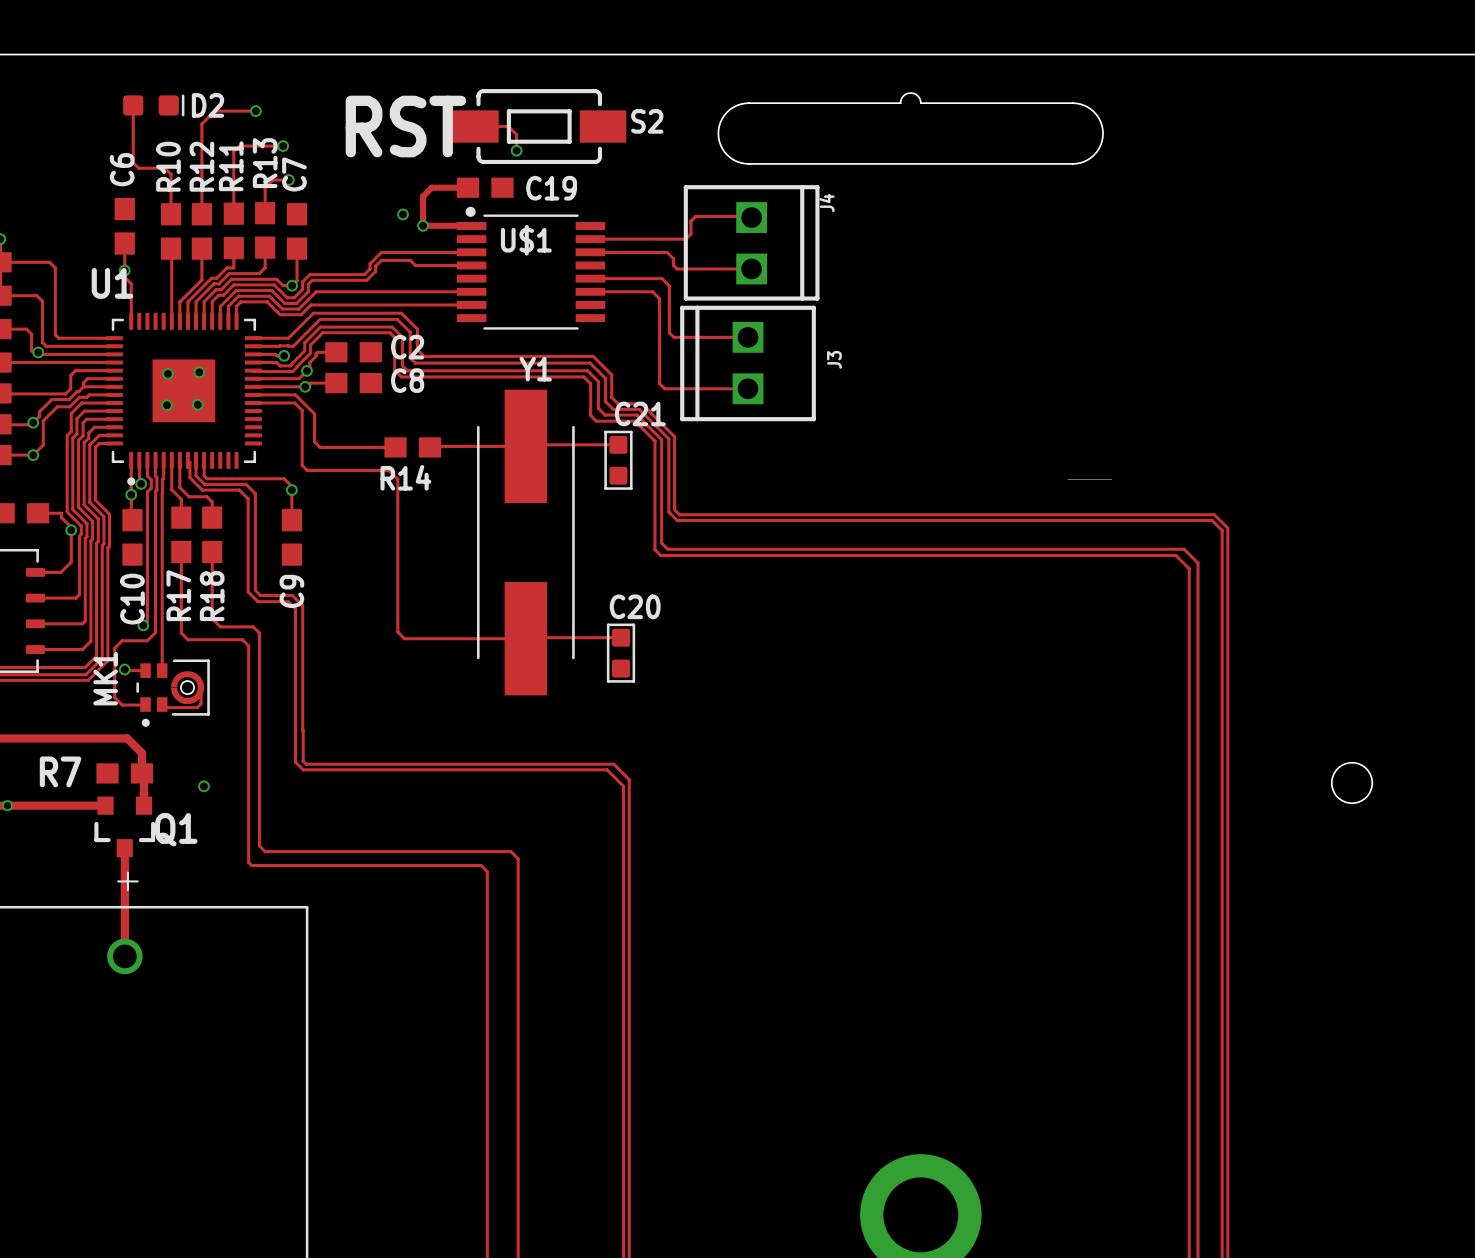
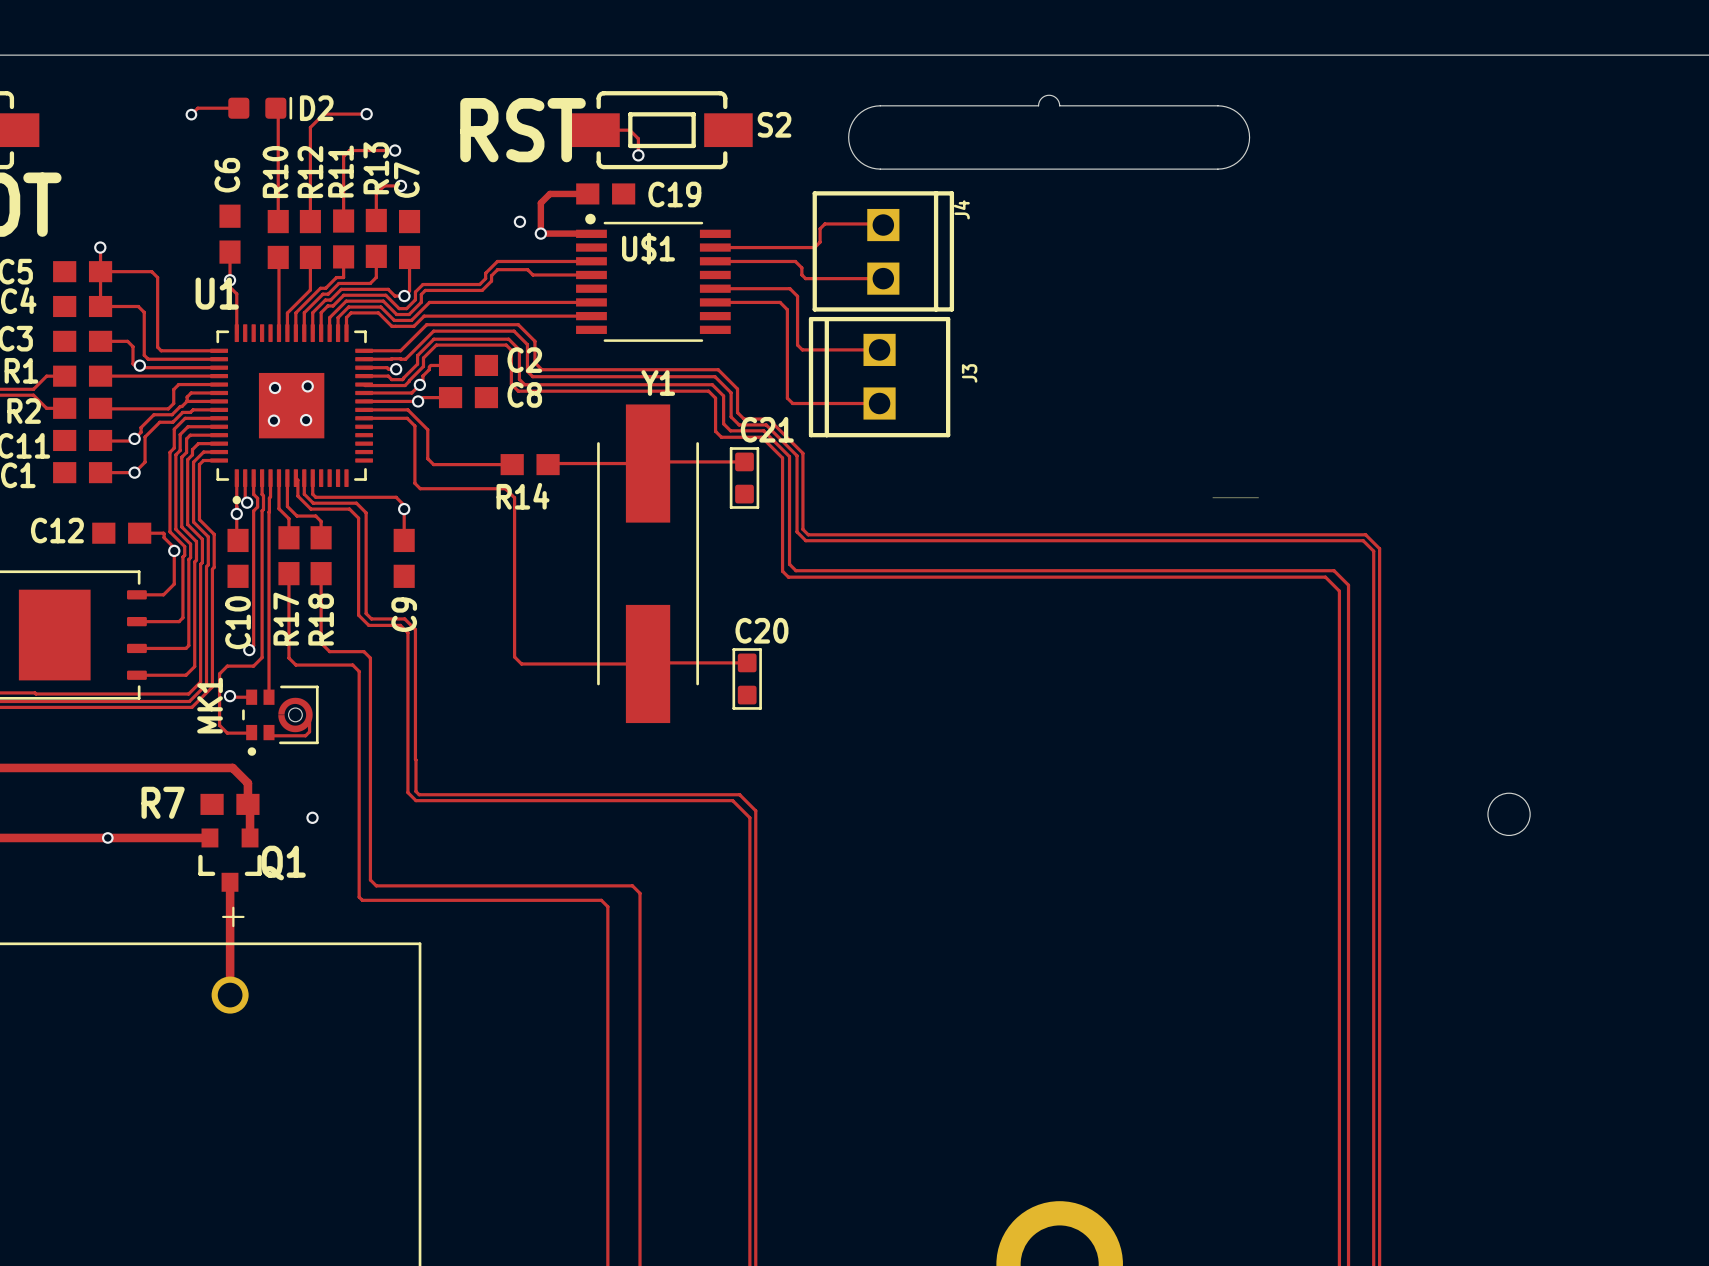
track: (133, 105) (133, 162) (138, 168) (164, 168) (171, 174) -> (275, 108) (278, 110) (278, 180)
track: none -> (238, 108) (197, 108) (191, 114)
via: none -> (191, 114)

